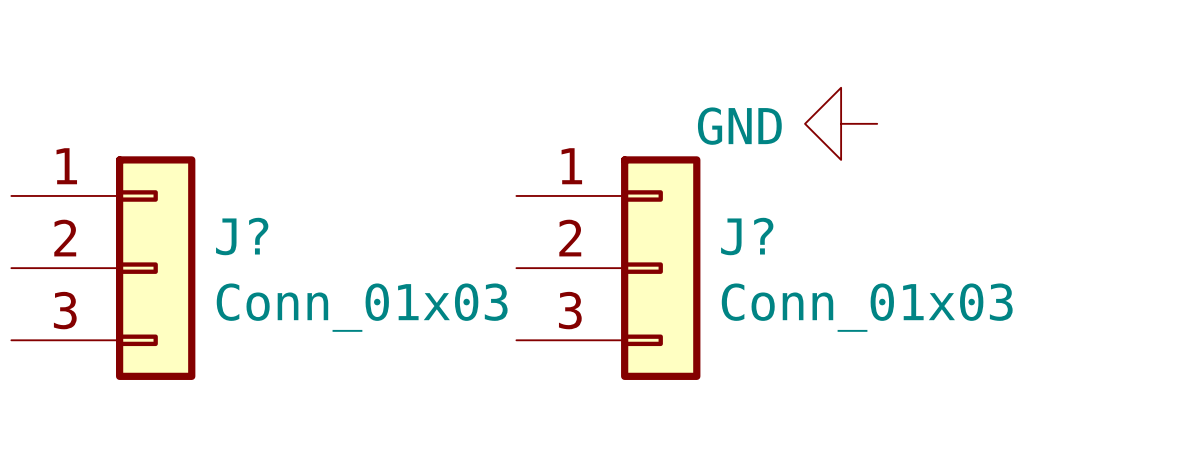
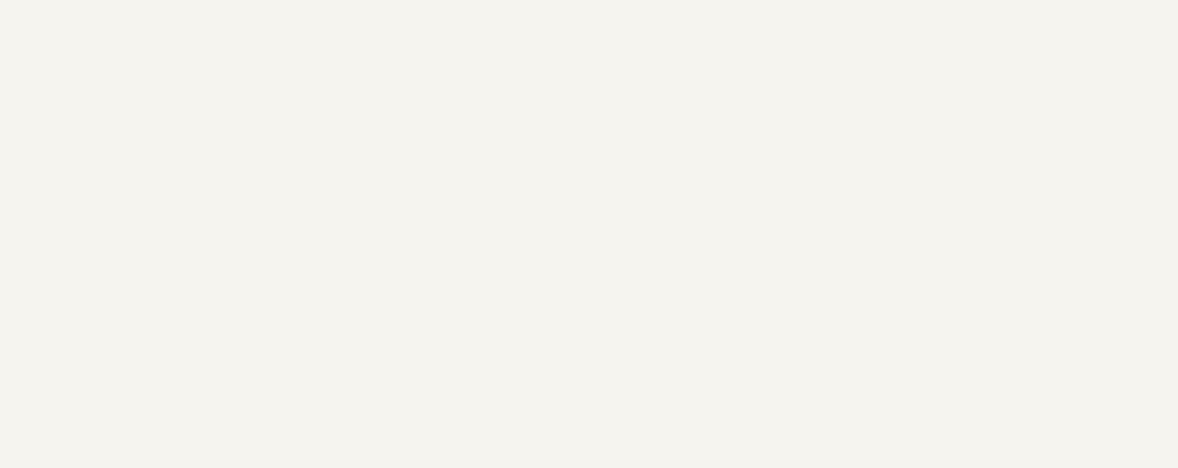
power symbol: GND (841, 123) -> none
J?: Conn_01x03 (103, 268) -> none
J?: Conn_01x03 (608, 268) -> none

